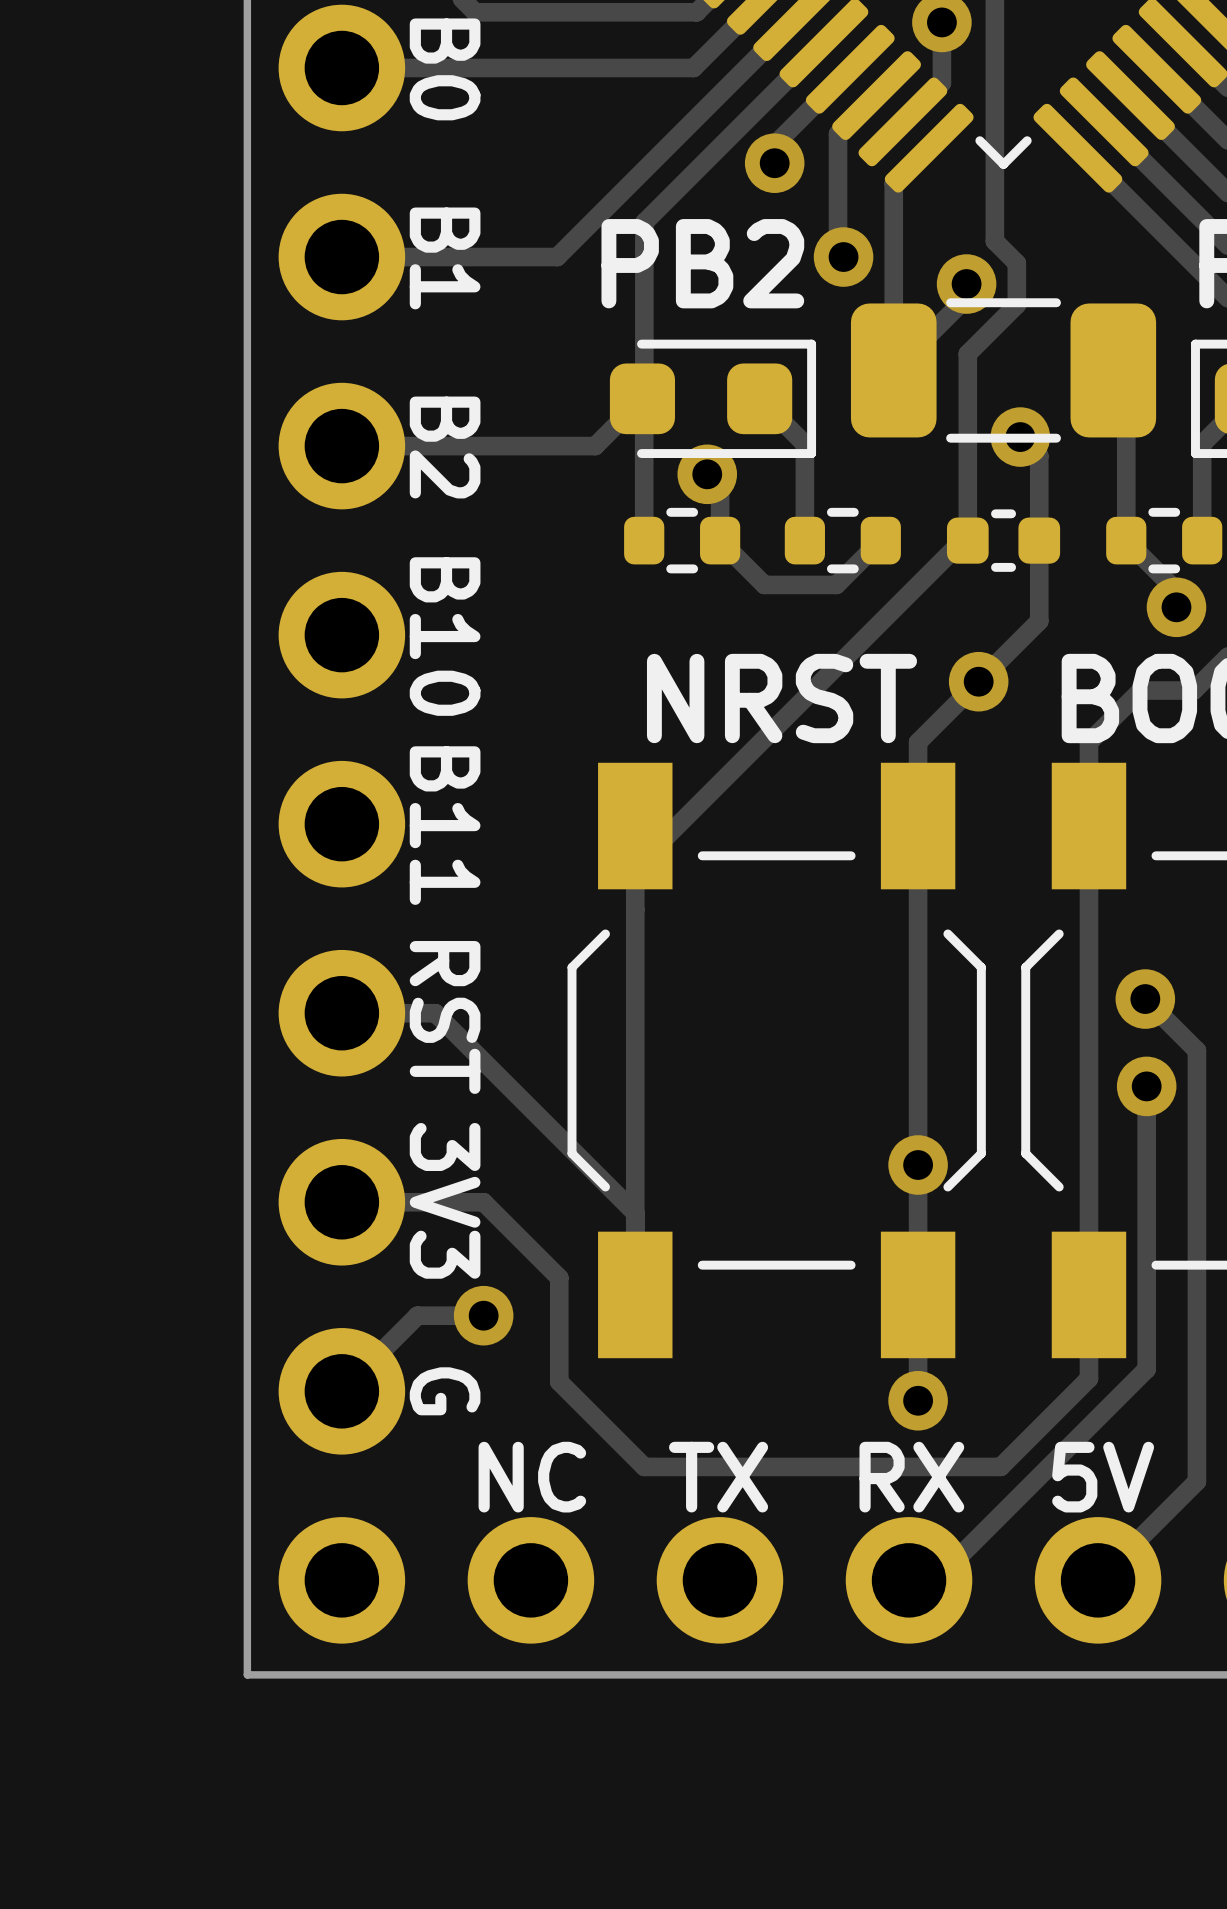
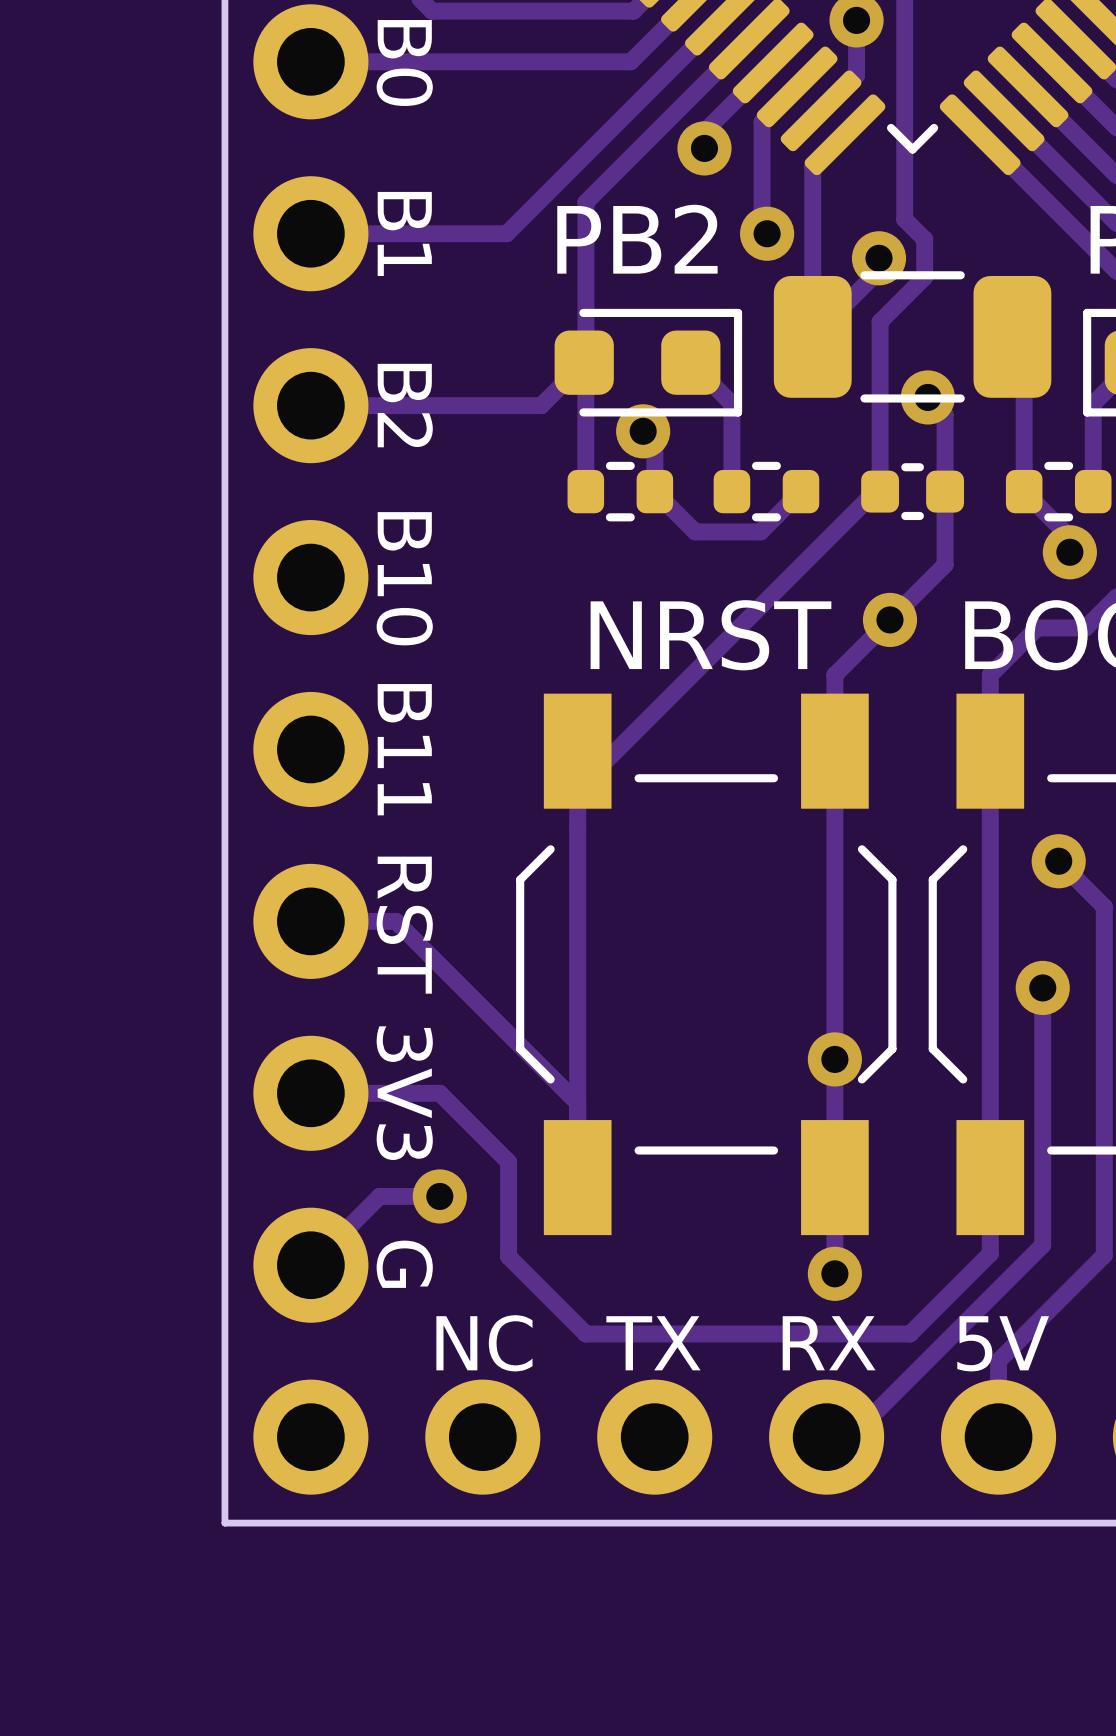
track: (1145, 999) (1196, 1050) (1196, 1481) (1098, 1580) -> (1058, 861) (1104, 906) (1104, 1255) (998, 1360) (998, 1437)
via position: (1145, 999) -> (1058, 861)

